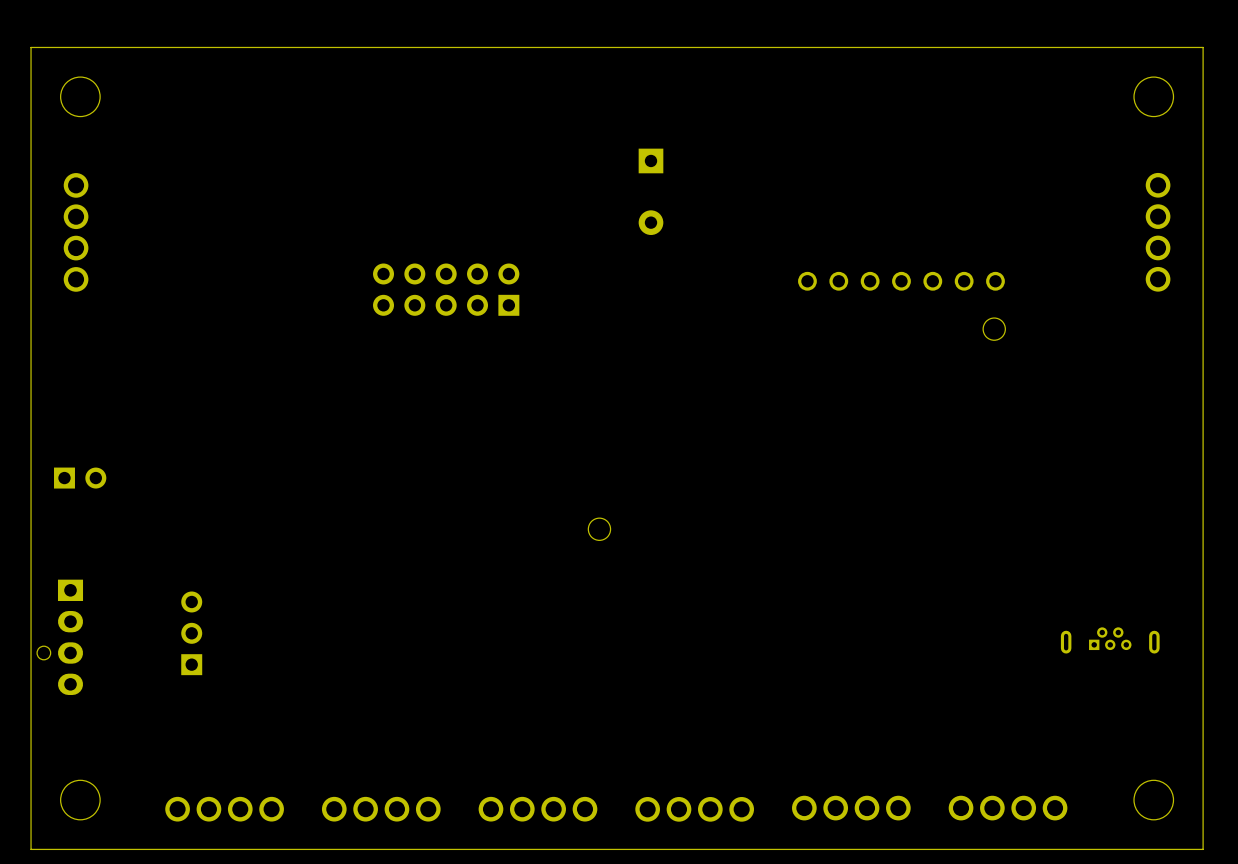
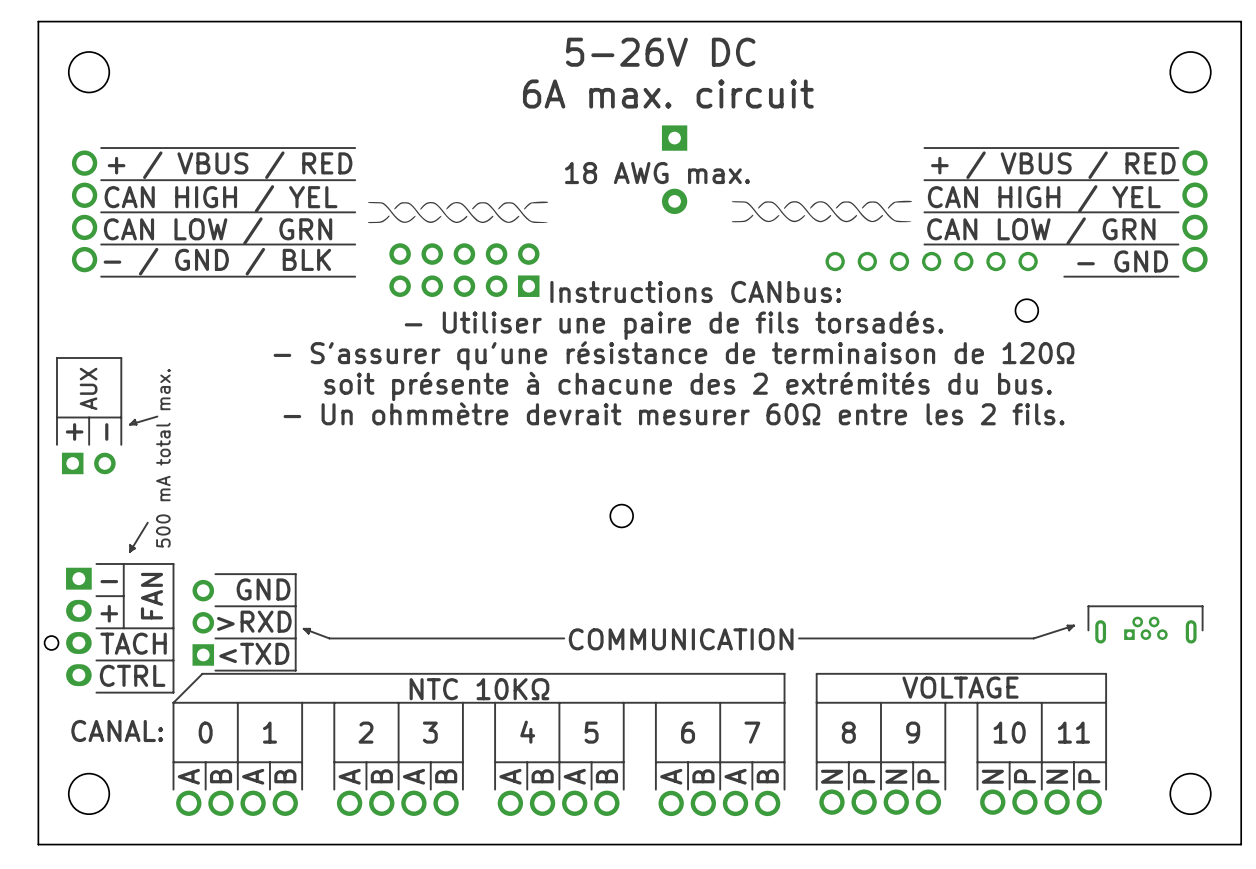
text: none -> 5-26V DC (660, 52)
text: none -> 6A max. circuit (668, 94)
line: none -> (355, 148) (101, 148)
line: none -> (1178, 148) (924, 148)
text: none -> + / VBUS / RED (230, 165)
text: none -> + / VBUS / RED (1053, 165)
text: none -> 18 AWG max. (657, 173)
line: none -> (355, 180) (101, 180)
line: none -> (1178, 180) (924, 180)
text: none -> CAN HIGH / YEL (221, 198)
text: none -> CAN HIGH / YEL (1044, 198)
drawing: none -> [368, 201, 549, 224]
drawing: none -> [731, 200, 912, 223]
line: none -> (355, 212) (101, 212)
line: none -> (1178, 212) (924, 212)
text: none -> CAN LOW / GRN (218, 231)
text: none -> CAN LOW / GRN (1041, 231)
line: none -> (355, 244) (101, 244)
line: none -> (1178, 244) (924, 244)
text: none -> - / GND / BLK (217, 261)
text: none -> - GND (1122, 261)
line: none -> (355, 276) (101, 276)
line: none -> (1178, 276) (1064, 276)
text: none -> Instructions CANbus: (695, 291)
text: none -> - Utiliser une paire de fils torsadés. (674, 325)
text: none -> - S'assurer qu'une résistance de terminaison de 120Ω (674, 355)
text: none -> soit présente à chacune des 2 extrémités du bus. (688, 386)
text: none -> AUX (88, 388)
text: none -> - Un ohmmètre devrait mesurer 60Ω entre les 2 fils. (674, 413)
line: none -> (157, 416) (130, 424)
line: none -> (89, 417) (89, 444)
line: none -> (121, 417) (56, 417)
line: none -> (130, 424) (134, 419) (136, 424) (130, 424)
text: none -> + (74, 431)
text: none -> - (106, 431)
line: none -> (121, 444) (121, 357) (56, 357) (56, 444)
text: none -> 500 mA total max. (163, 458)
line: none -> (147, 522) (130, 551)
line: none -> (130, 551) (130, 545) (134, 548) (130, 551)
line: none -> (96, 563) (173, 563) (173, 692) (96, 692)
line: none -> (123, 563) (123, 628)
line: none -> (215, 574) (295, 574) (295, 670) (215, 670)
text: none -> - (109, 581)
text: none -> GND (263, 589)
line: none -> (123, 596) (96, 596)
text: none -> FAN (152, 596)
line: none -> (295, 606) (215, 606)
text: none -> + (109, 613)
text: none -> >RXD (254, 621)
line: none -> (1073, 625) (1069, 630) (1067, 625) (1073, 625)
line: none -> (1073, 625) (1033, 638) (798, 638)
line: none -> (173, 628) (96, 628)
line: none -> (303, 628) (329, 638) (564, 638)
line: none -> (303, 628) (310, 628) (308, 633) (303, 628)
line: none -> (1202, 630) (1202, 606) (1088, 606) (1088, 630)
line: none -> (295, 638) (215, 638)
text: none -> COMMUNICATION (681, 639)
text: none -> TACH (133, 643)
text: none -> <TXD (254, 653)
line: none -> (173, 660) (96, 660)
text: none -> CTRL (132, 675)
text: none -> VOLTAGE (960, 687)
text: none -> NTC 10KΩ (479, 689)
line: none -> (173, 702) (173, 789)
line: none -> (173, 702) (202, 673) (784, 673) (784, 789)
line: none -> (237, 702) (237, 789)
line: none -> (302, 702) (302, 789)
line: none -> (334, 702) (334, 789)
line: none -> (398, 702) (398, 789)
line: none -> (462, 702) (462, 789)
line: none -> (495, 702) (495, 789)
line: none -> (559, 702) (559, 789)
line: none -> (623, 702) (623, 789)
line: none -> (655, 702) (655, 789)
line: none -> (720, 702) (720, 789)
line: none -> (784, 702) (173, 702)
line: none -> (881, 702) (881, 789)
line: none -> (945, 702) (945, 789)
line: none -> (977, 702) (977, 789)
line: none -> (1041, 702) (1041, 789)
line: none -> (1106, 702) (816, 702)
text: none -> CANAL: (117, 731)
text: none -> 4 (527, 732)
text: none -> 0 (205, 732)
text: none -> 1 (269, 732)
text: none -> 2 (366, 732)
text: none -> 3 (430, 732)
text: none -> 5 (591, 732)
text: none -> 6 (688, 732)
text: none -> 7 (752, 732)
text: none -> 8 (848, 732)
text: none -> 9 (913, 732)
text: none -> 10 (1009, 732)
text: none -> 11 (1073, 732)
line: none -> (205, 762) (205, 789)
line: none -> (269, 762) (269, 789)
line: none -> (302, 762) (173, 762)
line: none -> (366, 762) (366, 789)
line: none -> (430, 762) (430, 789)
line: none -> (462, 762) (334, 762)
line: none -> (527, 762) (527, 789)
line: none -> (591, 762) (591, 789)
line: none -> (623, 762) (495, 762)
line: none -> (688, 762) (688, 789)
line: none -> (752, 762) (752, 789)
line: none -> (784, 762) (655, 762)
line: none -> (848, 762) (848, 789)
line: none -> (913, 762) (913, 789)
line: none -> (945, 762) (816, 762)
line: none -> (1009, 762) (1009, 789)
line: none -> (1073, 762) (1073, 789)
line: none -> (1106, 762) (977, 762)
text: none -> B (221, 776)
text: none -> B (285, 776)
text: none -> B (381, 776)
text: none -> B (446, 776)
text: none -> B (542, 776)
text: none -> B (606, 776)
text: none -> B (703, 776)
text: none -> B (767, 776)
text: none -> P (864, 776)
text: none -> P (928, 776)
text: none -> P (1025, 776)
text: none -> P (1089, 776)
text: none -> A (188, 776)
text: none -> A (253, 776)
text: none -> A (349, 776)
text: none -> A (413, 776)
text: none -> A (510, 776)
text: none -> A (574, 776)
text: none -> A (671, 776)
text: none -> A (735, 776)
text: none -> N (832, 776)
text: none -> N (896, 776)
text: none -> N (992, 776)
text: none -> N (1057, 776)
line: none -> (1106, 789) (1106, 673) (816, 673) (816, 789)

